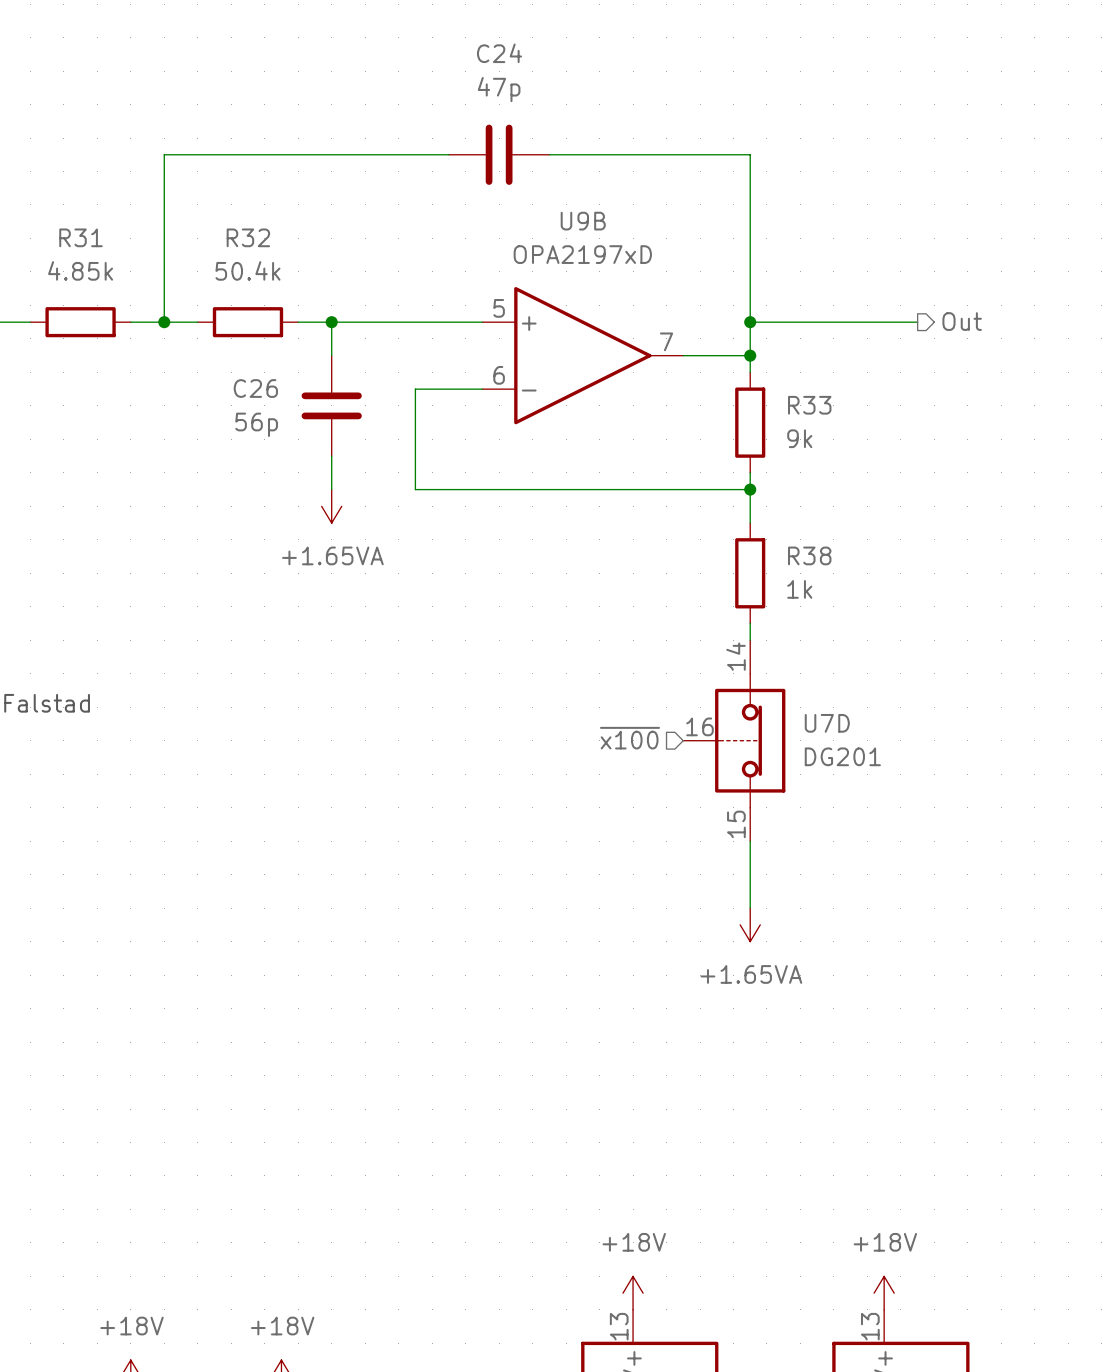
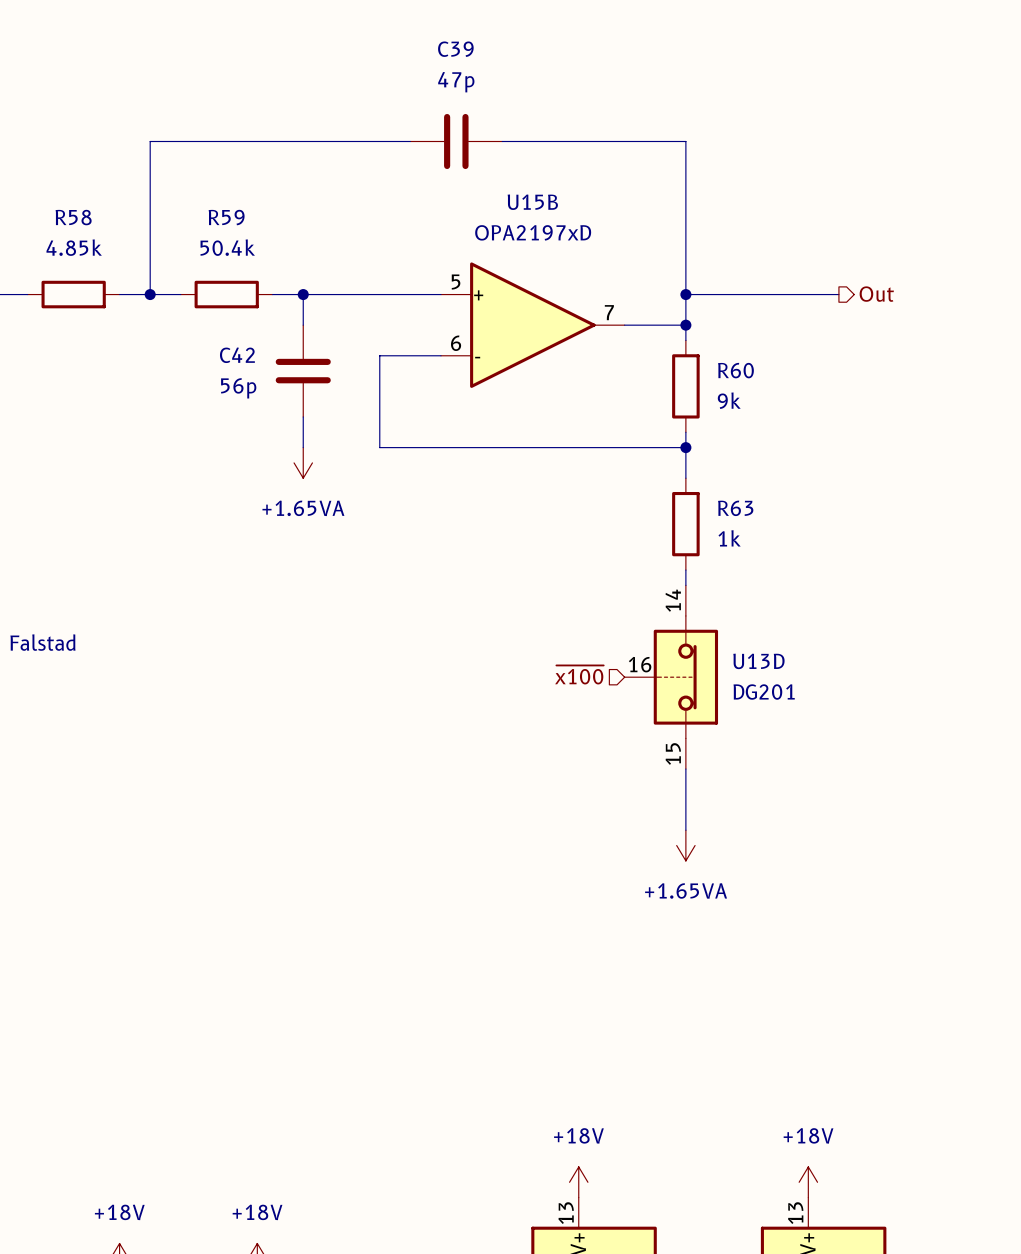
C24 name: C24 (499, 53) -> C39 (455, 49)
U9B name: U9B (583, 221) -> U15B (532, 202)
R31 name: R31 (80, 237) -> R58 (73, 217)
R32 name: R32 (248, 237) -> R59 (226, 217)
C26 name: C26 (255, 388) -> C42 (237, 355)
R33 name: R33 (809, 405) -> R60 (735, 370)
R38 name: R38 (809, 555) -> R63 (735, 508)
U7D name: U7D (827, 723) -> U13D (758, 661)

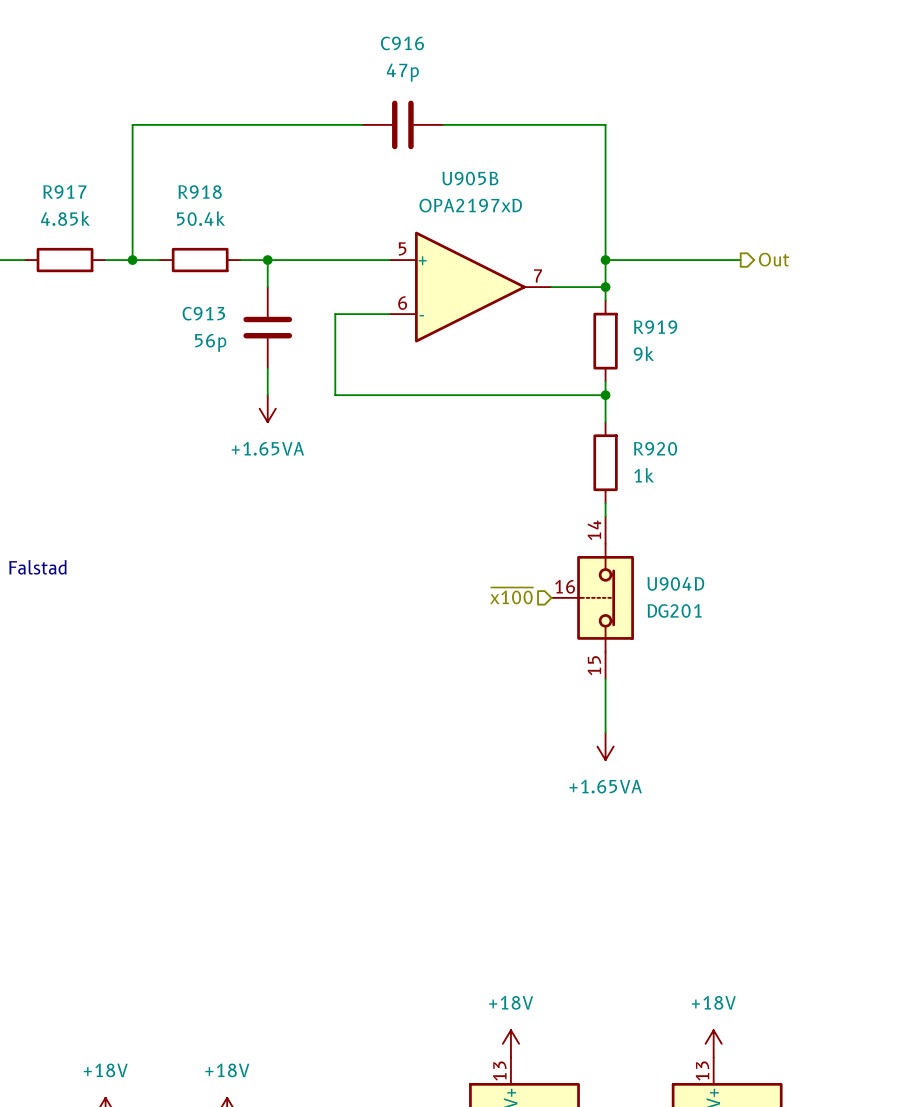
C39 name: C39 (455, 49) -> C916 (402, 43)
U15B name: U15B (532, 202) -> U905B (470, 178)
R58 name: R58 (73, 217) -> R917 (64, 192)
R59 name: R59 (226, 217) -> R918 (200, 192)
C42 name: C42 (237, 355) -> C913 (203, 313)
R60 name: R60 (735, 370) -> R919 (655, 327)
R63 name: R63 (735, 508) -> R920 (655, 448)
U13D name: U13D (758, 661) -> U904D (675, 583)

